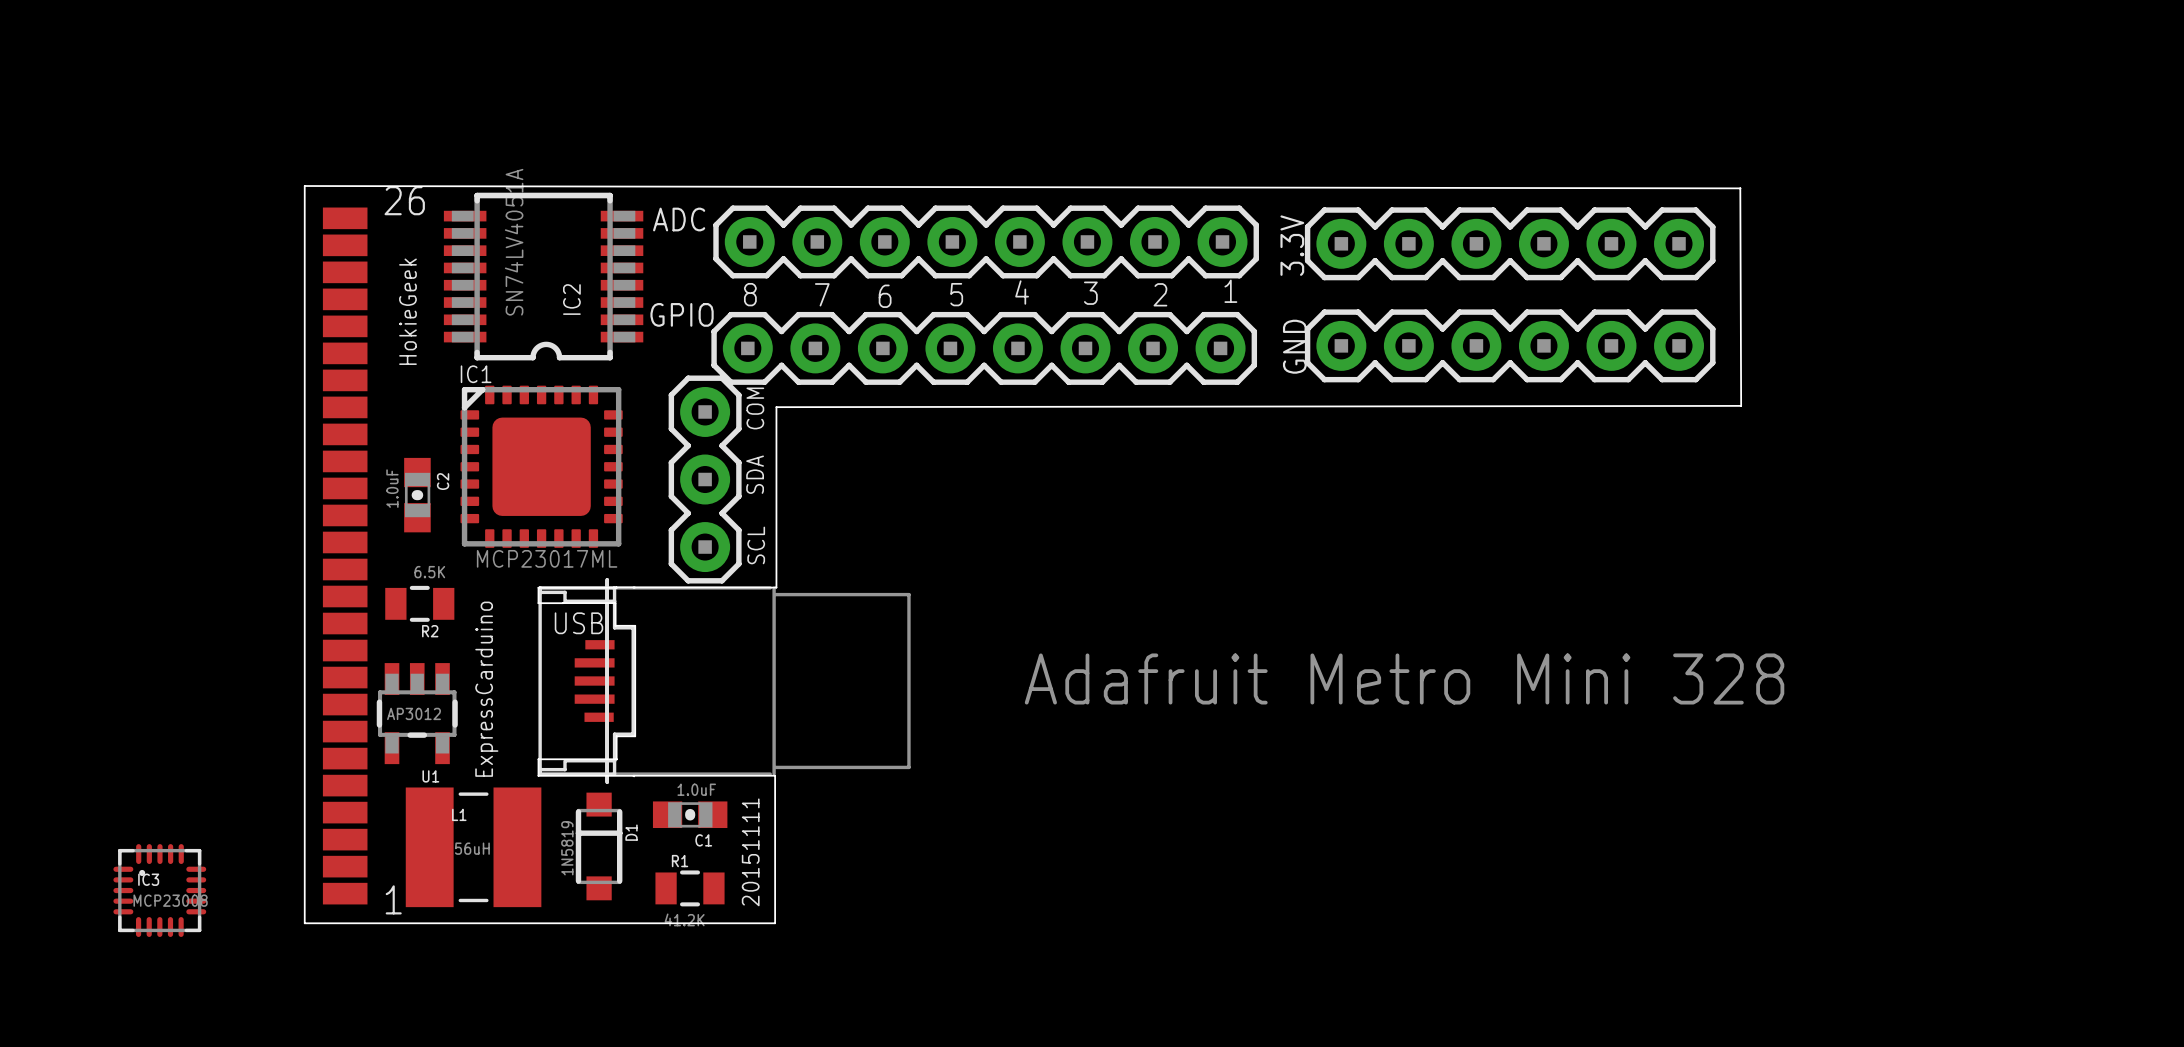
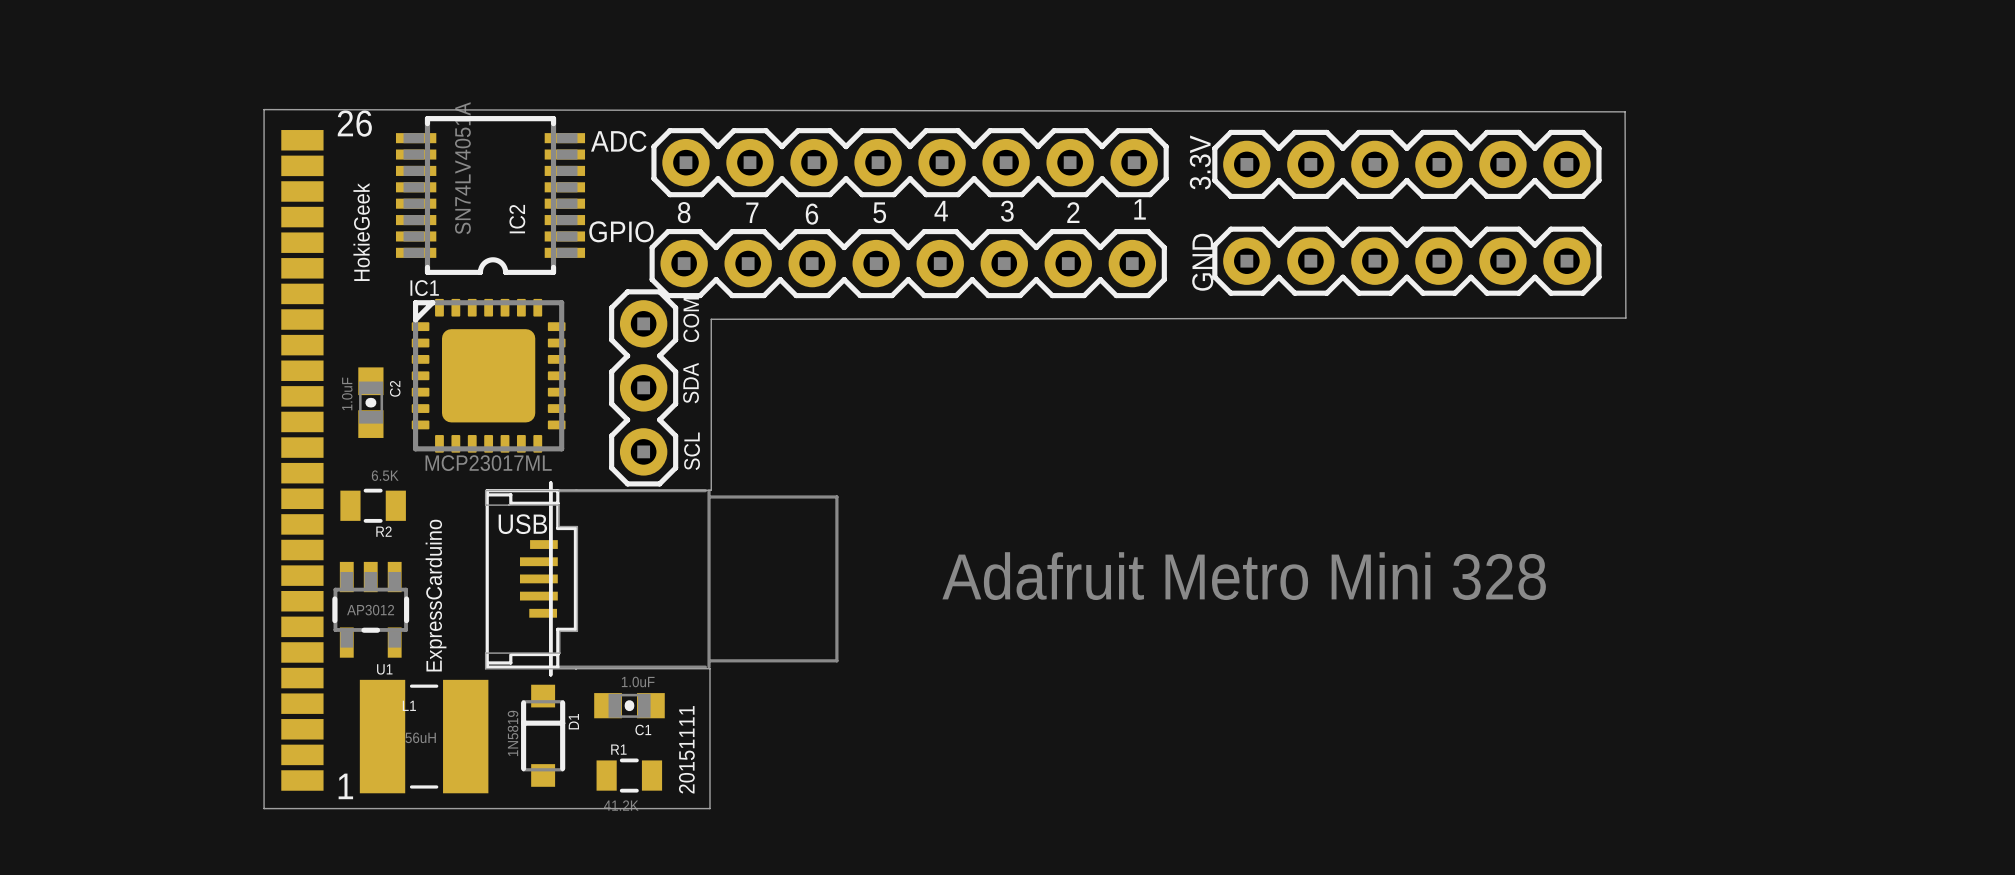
IC3: MCP23008 (159, 890) -> none

